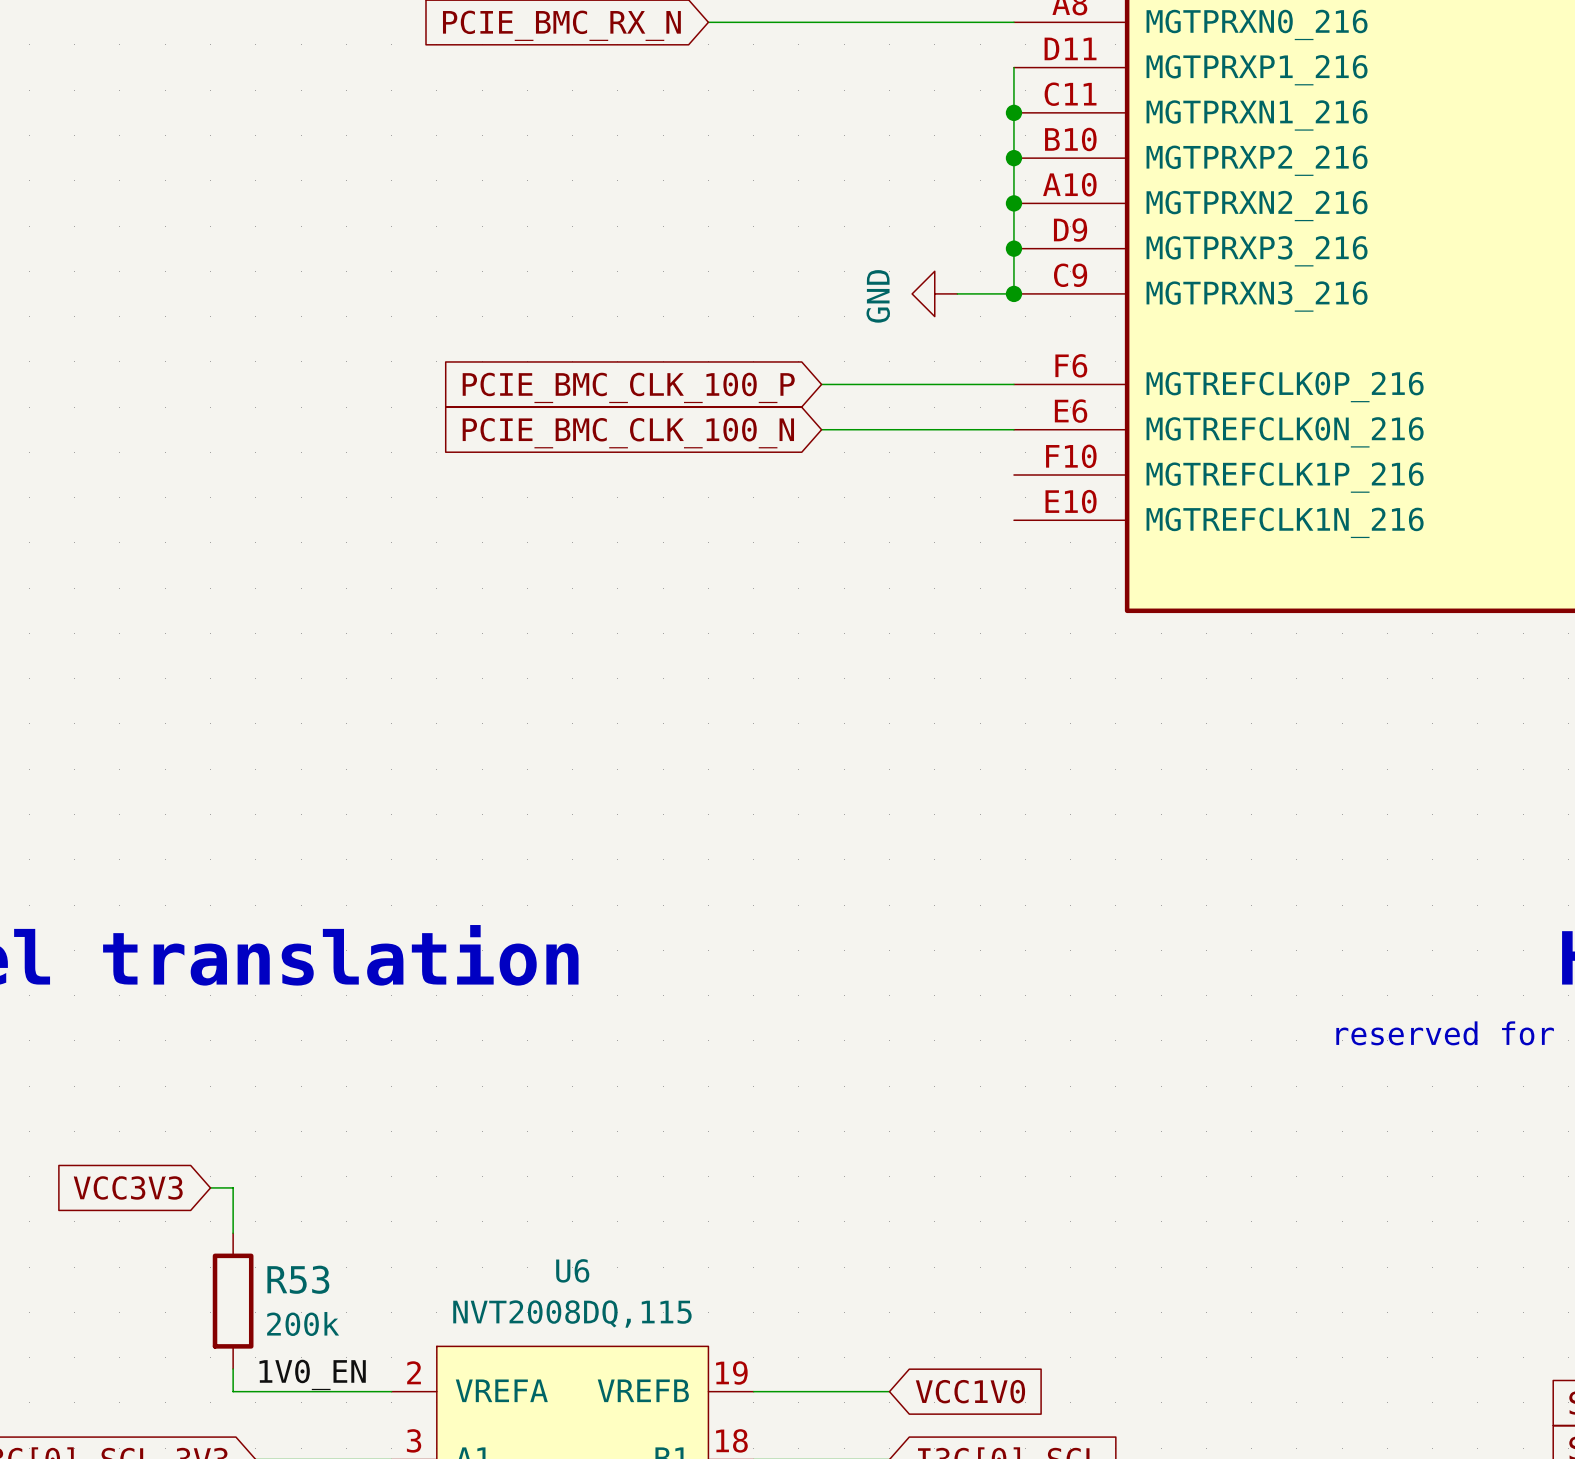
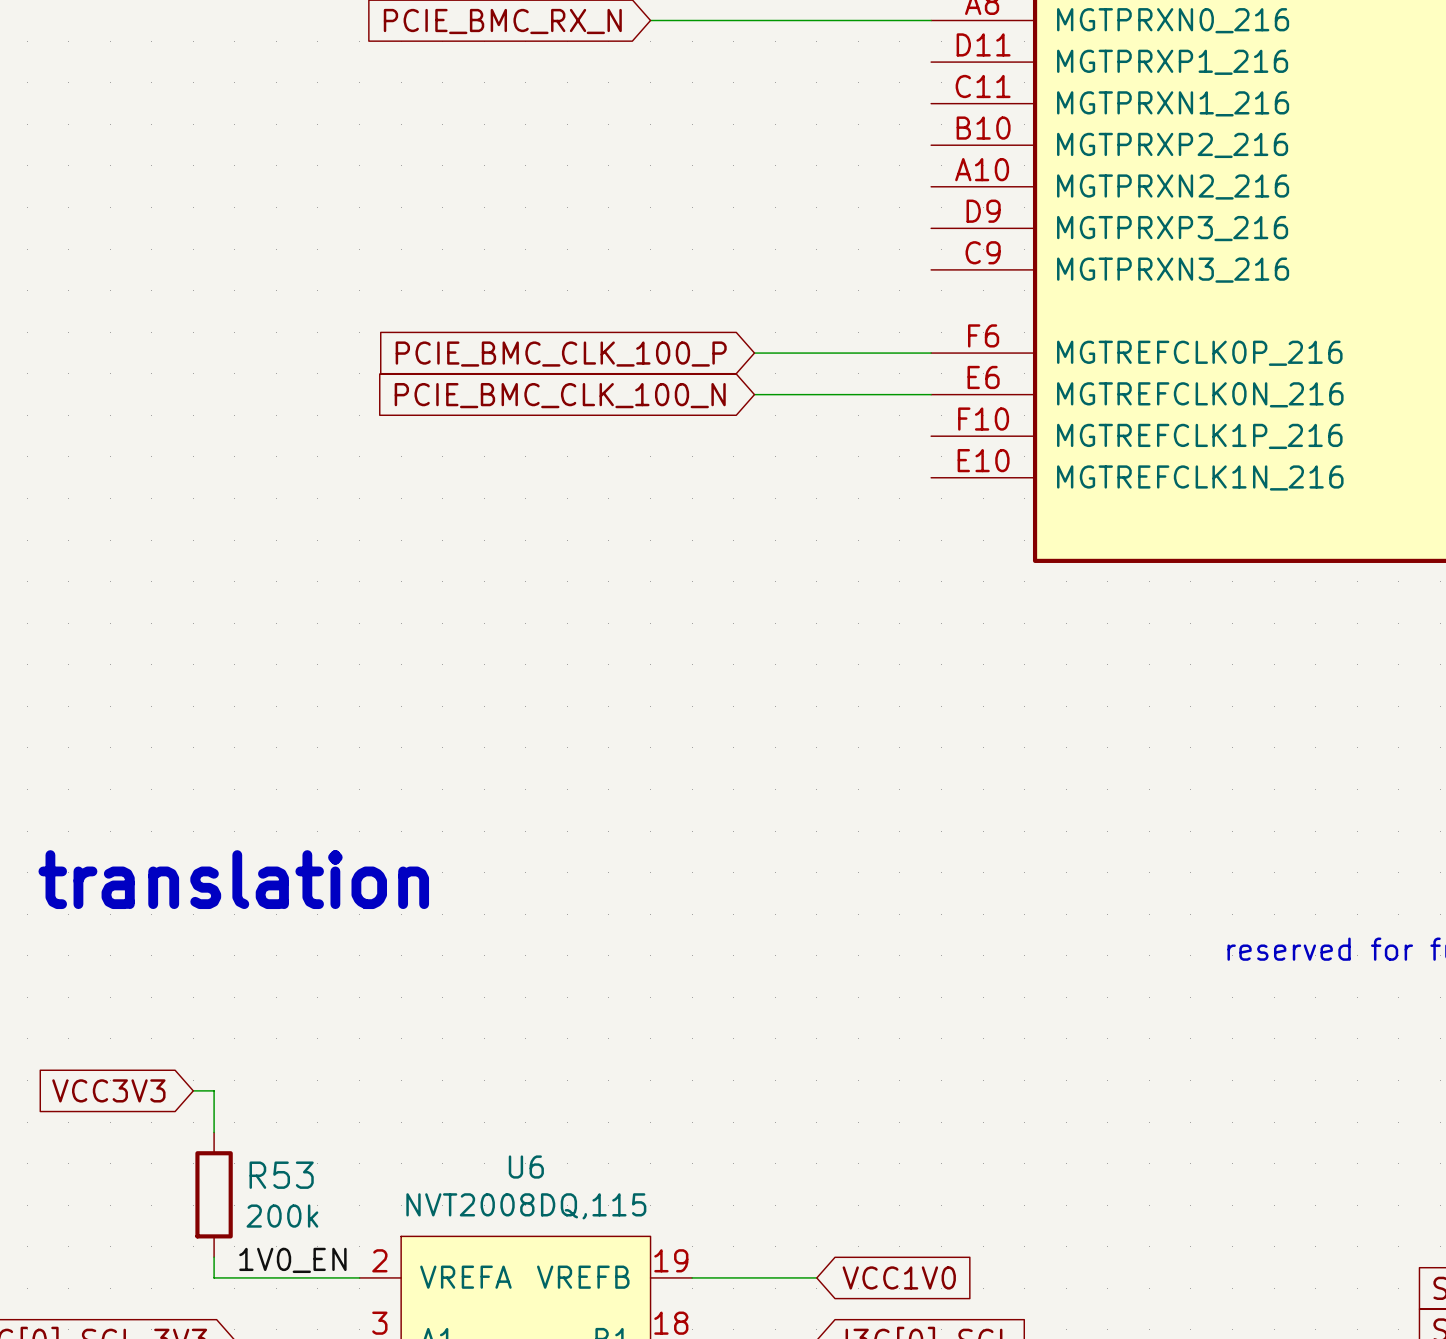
wire: (1013, 67) (1013, 293) (957, 293) -> none
junction: (1013, 112) -> none
junction: (1013, 158) -> none
junction: (1013, 203) -> none
junction: (1013, 248) -> none
power symbol: GND (934, 293) -> none
junction: (1013, 293) -> none

